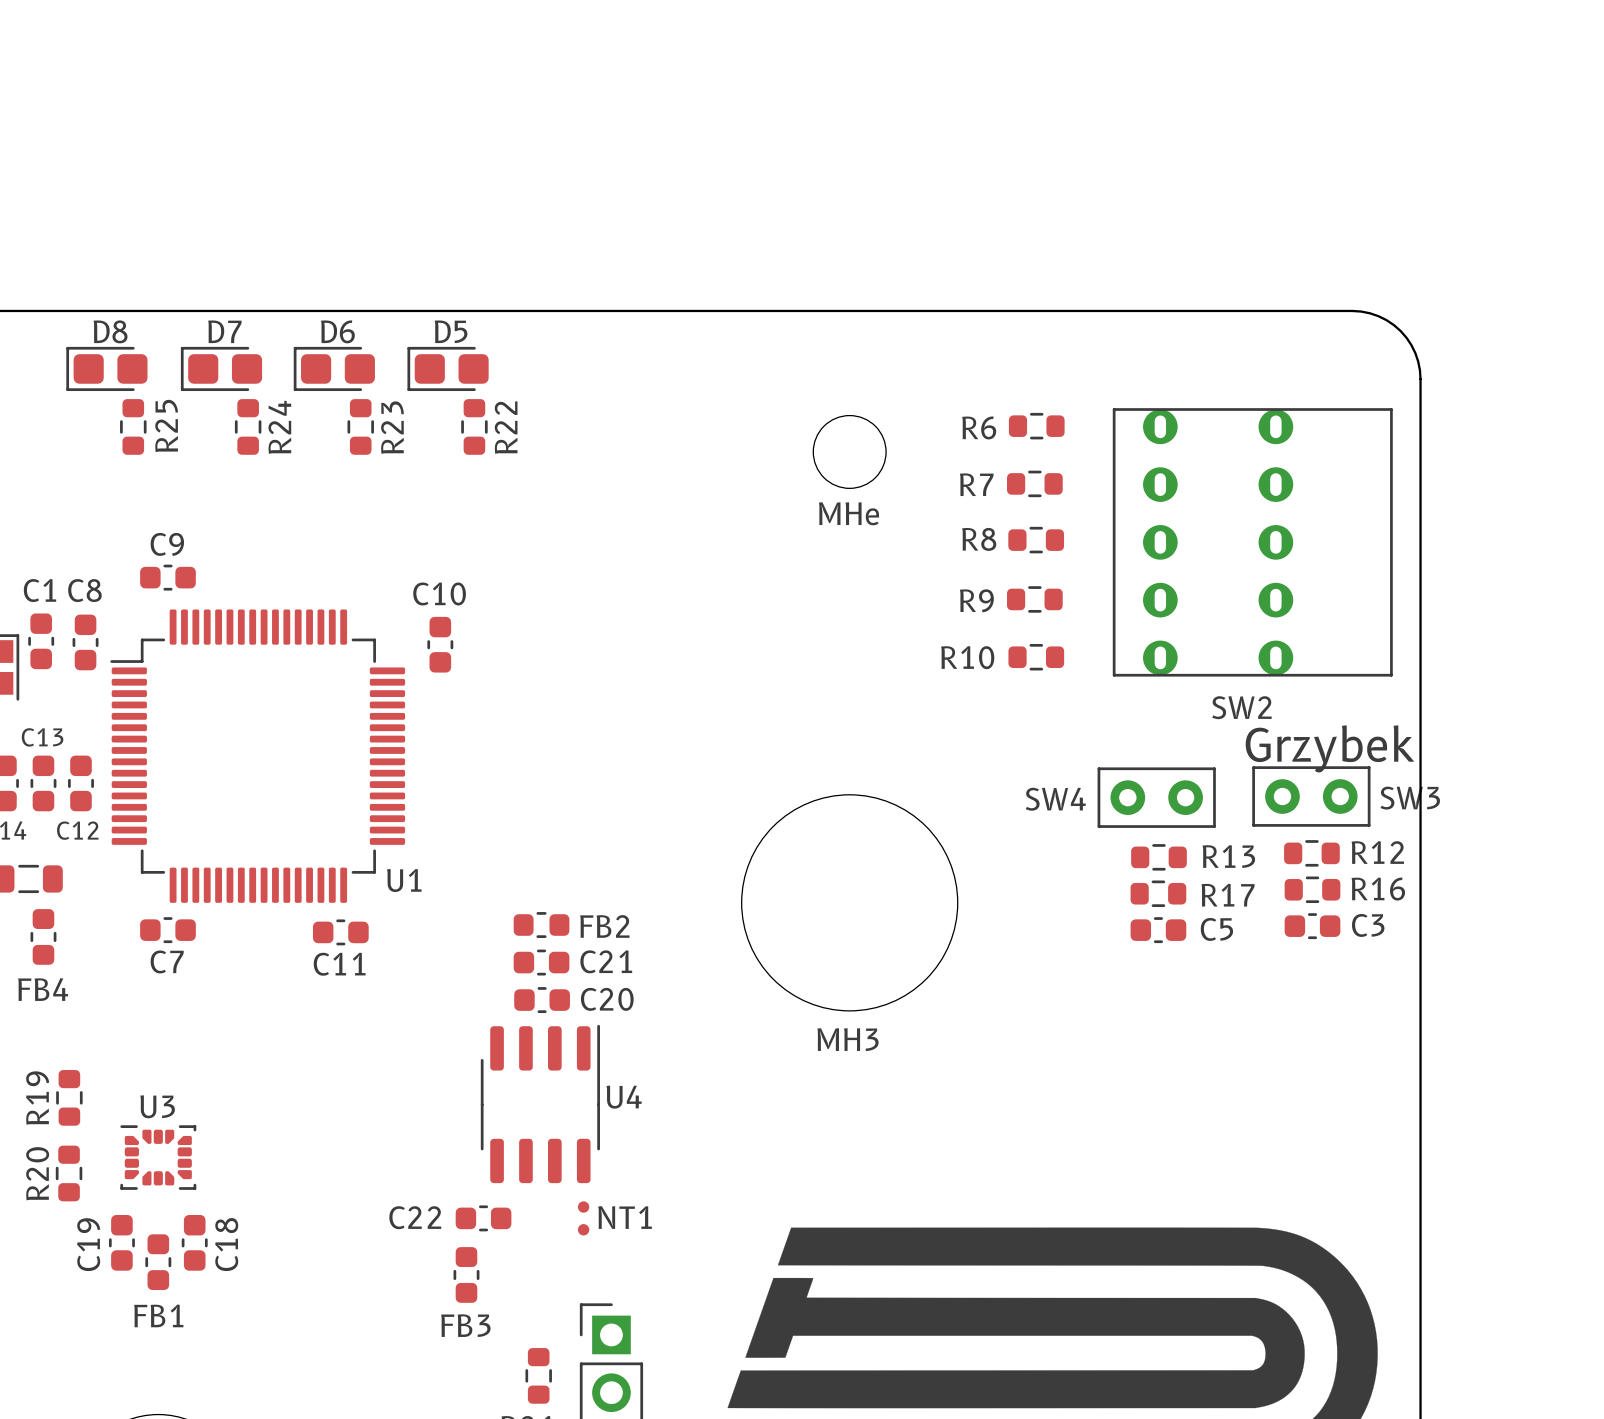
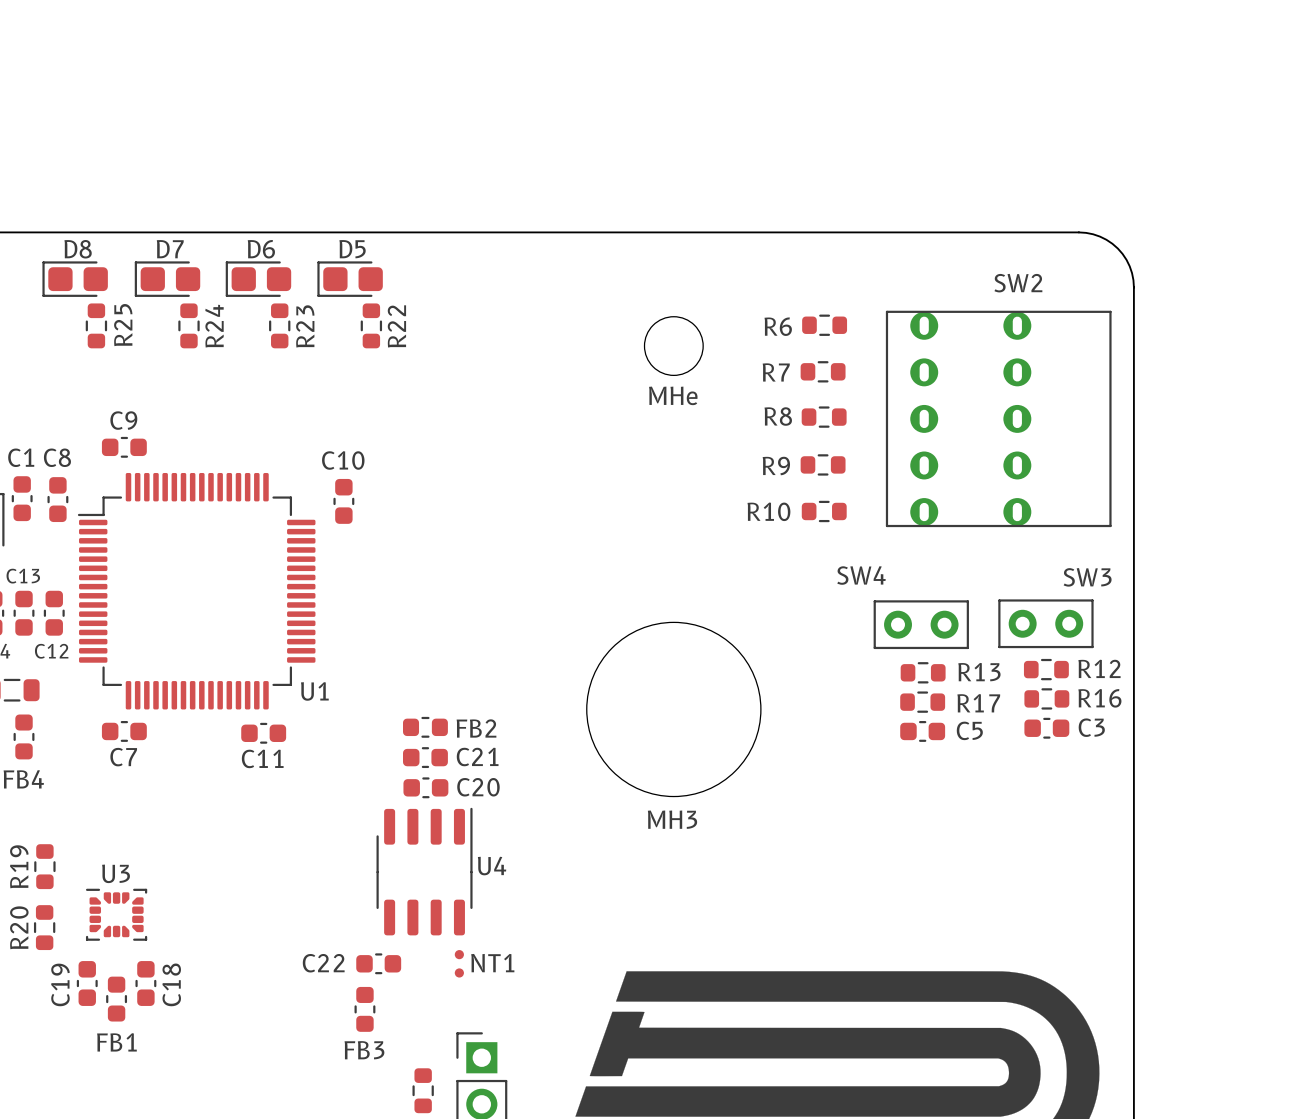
SW2 name position: SW2 (1241, 707) -> SW2 (1018, 283)
text: Grzybek (1329, 748) -> none
SW3 name position: SW3 (1410, 798) -> SW3 (1087, 577)
SW4 name position: SW4 (1055, 799) -> SW4 (861, 575)

